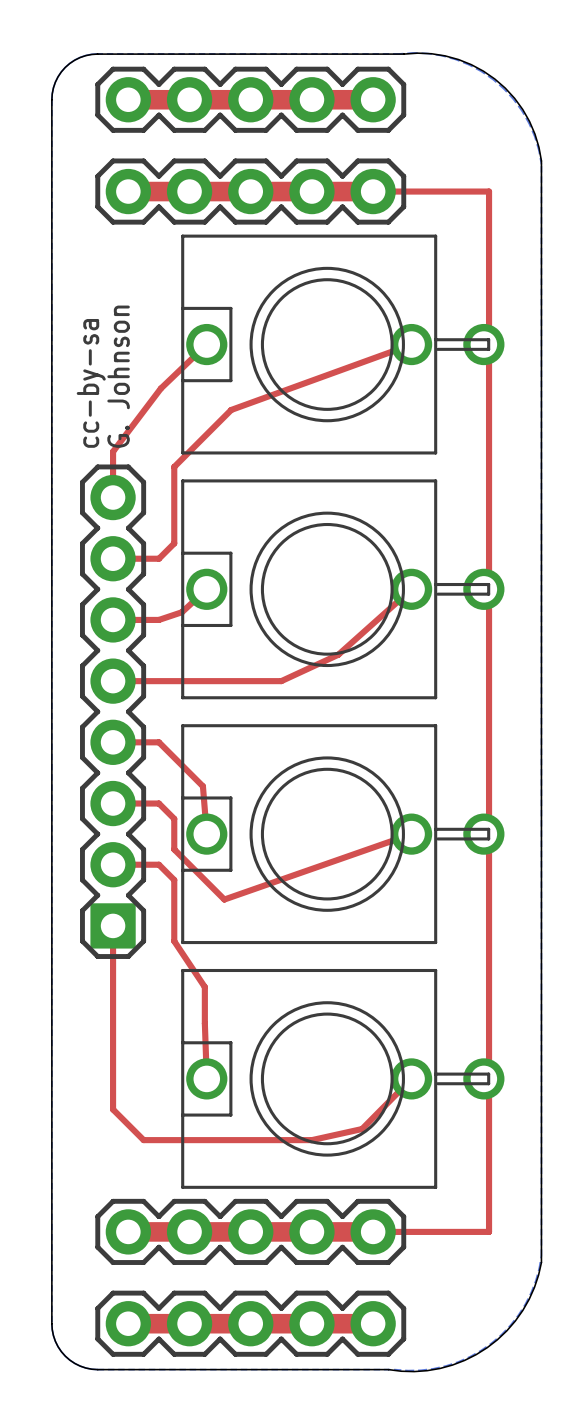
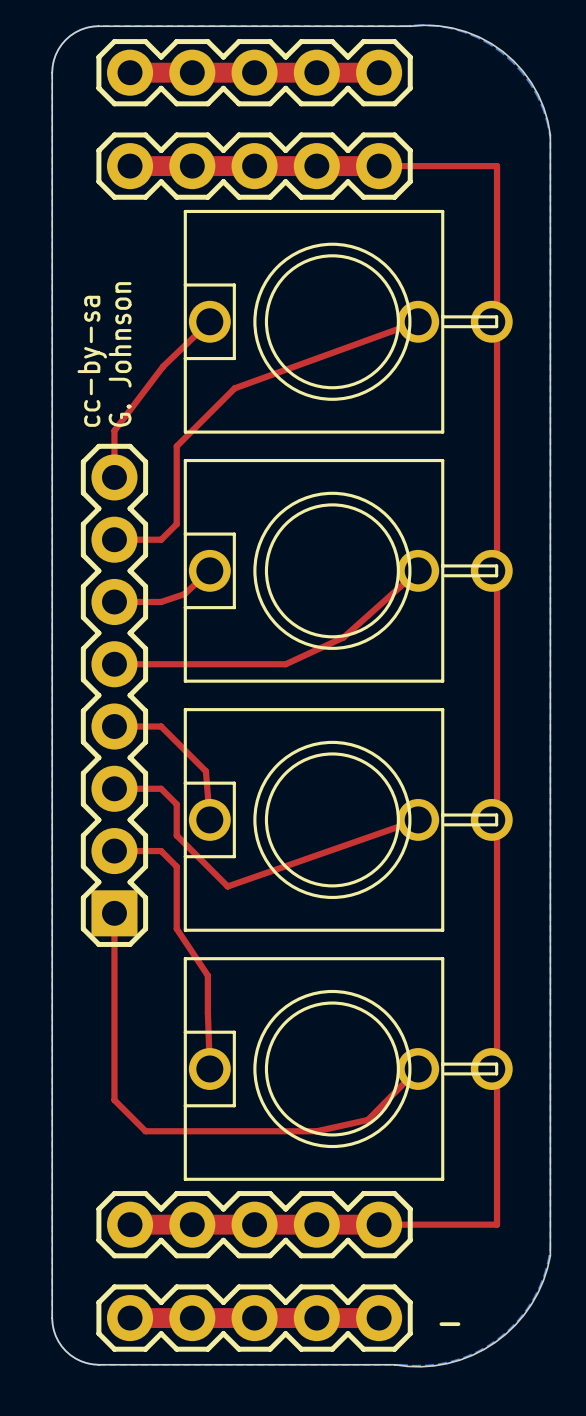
text: none -> - (449, 1324)

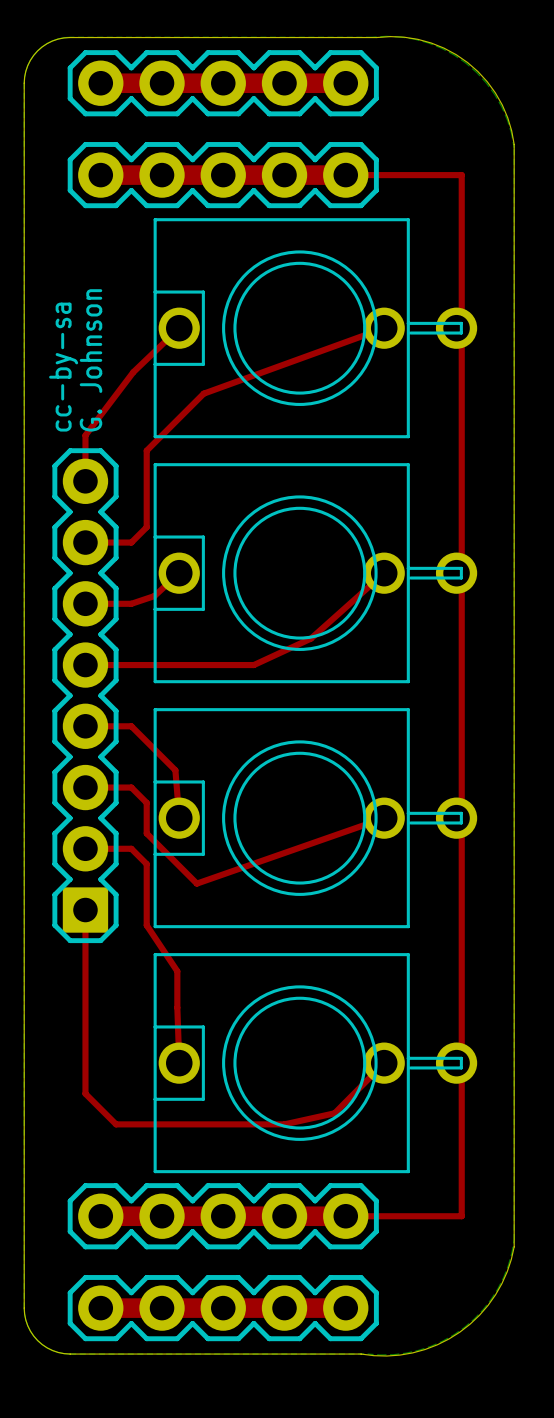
text: - (449, 1324) -> none

